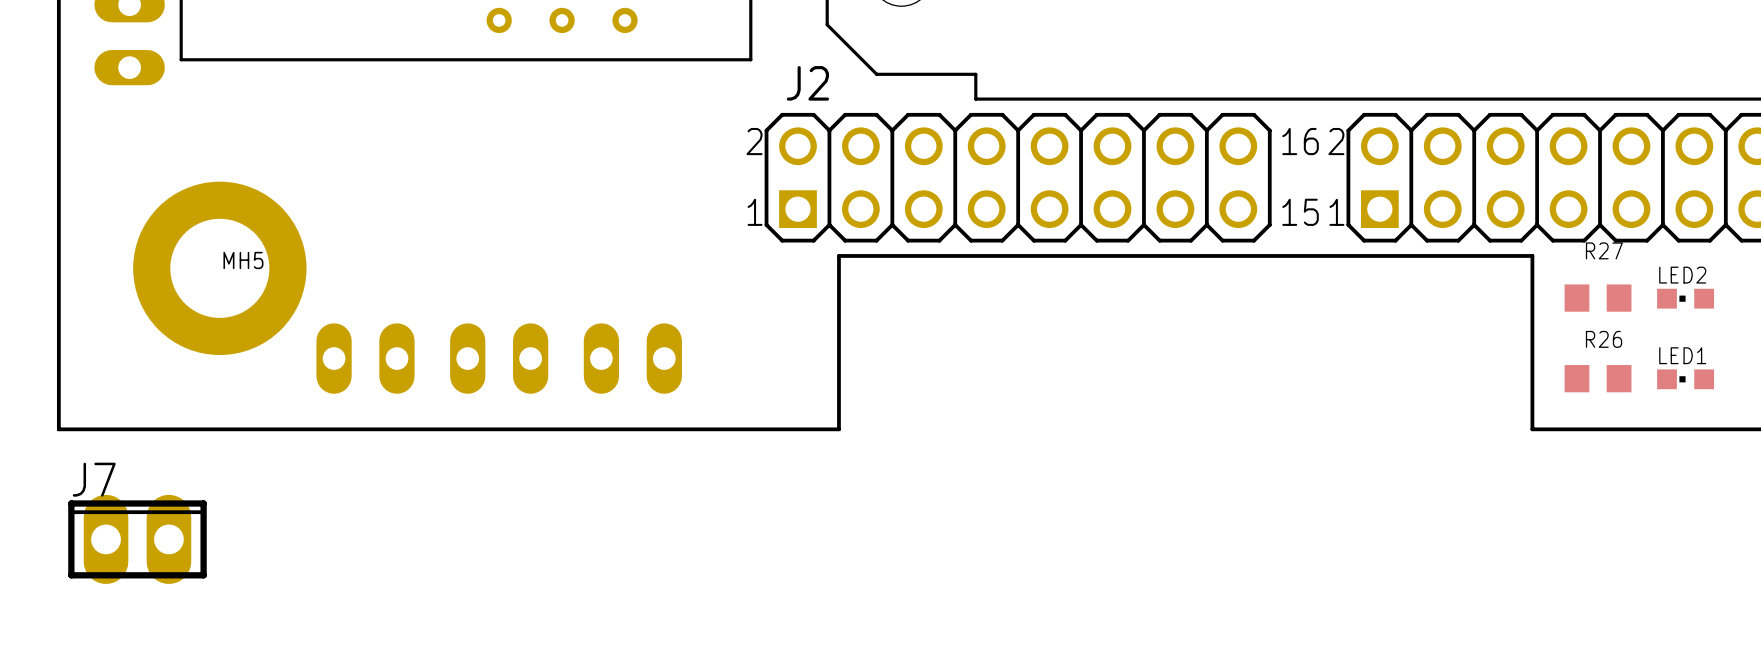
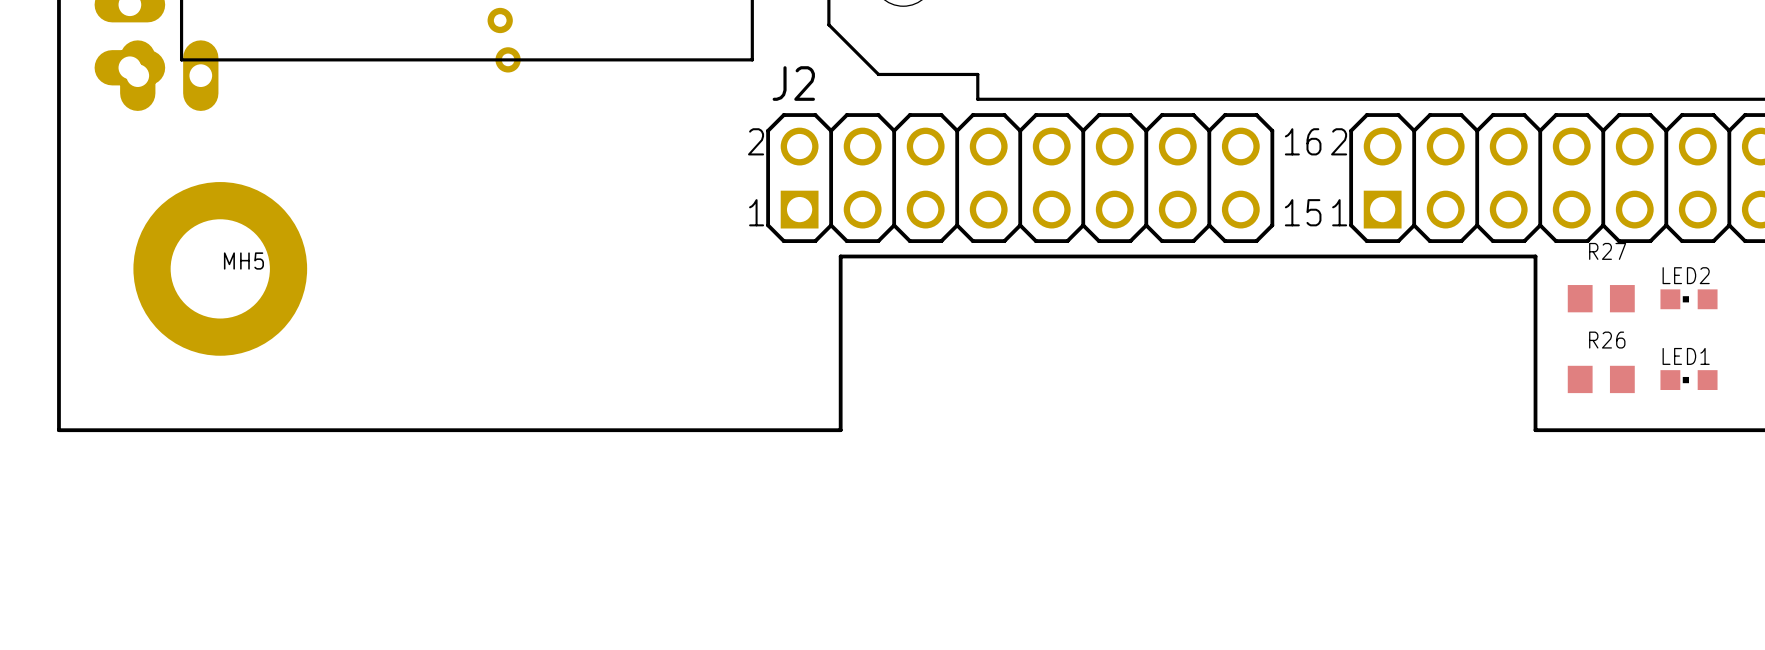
part: (562, 20) -> none
part: (624, 20) -> none
part: none -> (508, 59)
part: none -> (169, 75)
J2 name position: J2 (807, 83) -> J2 (793, 83)
part: (365, 358) -> none
part: (499, 358) -> none
part: (632, 358) -> none
J7: (137, 539) -> none

